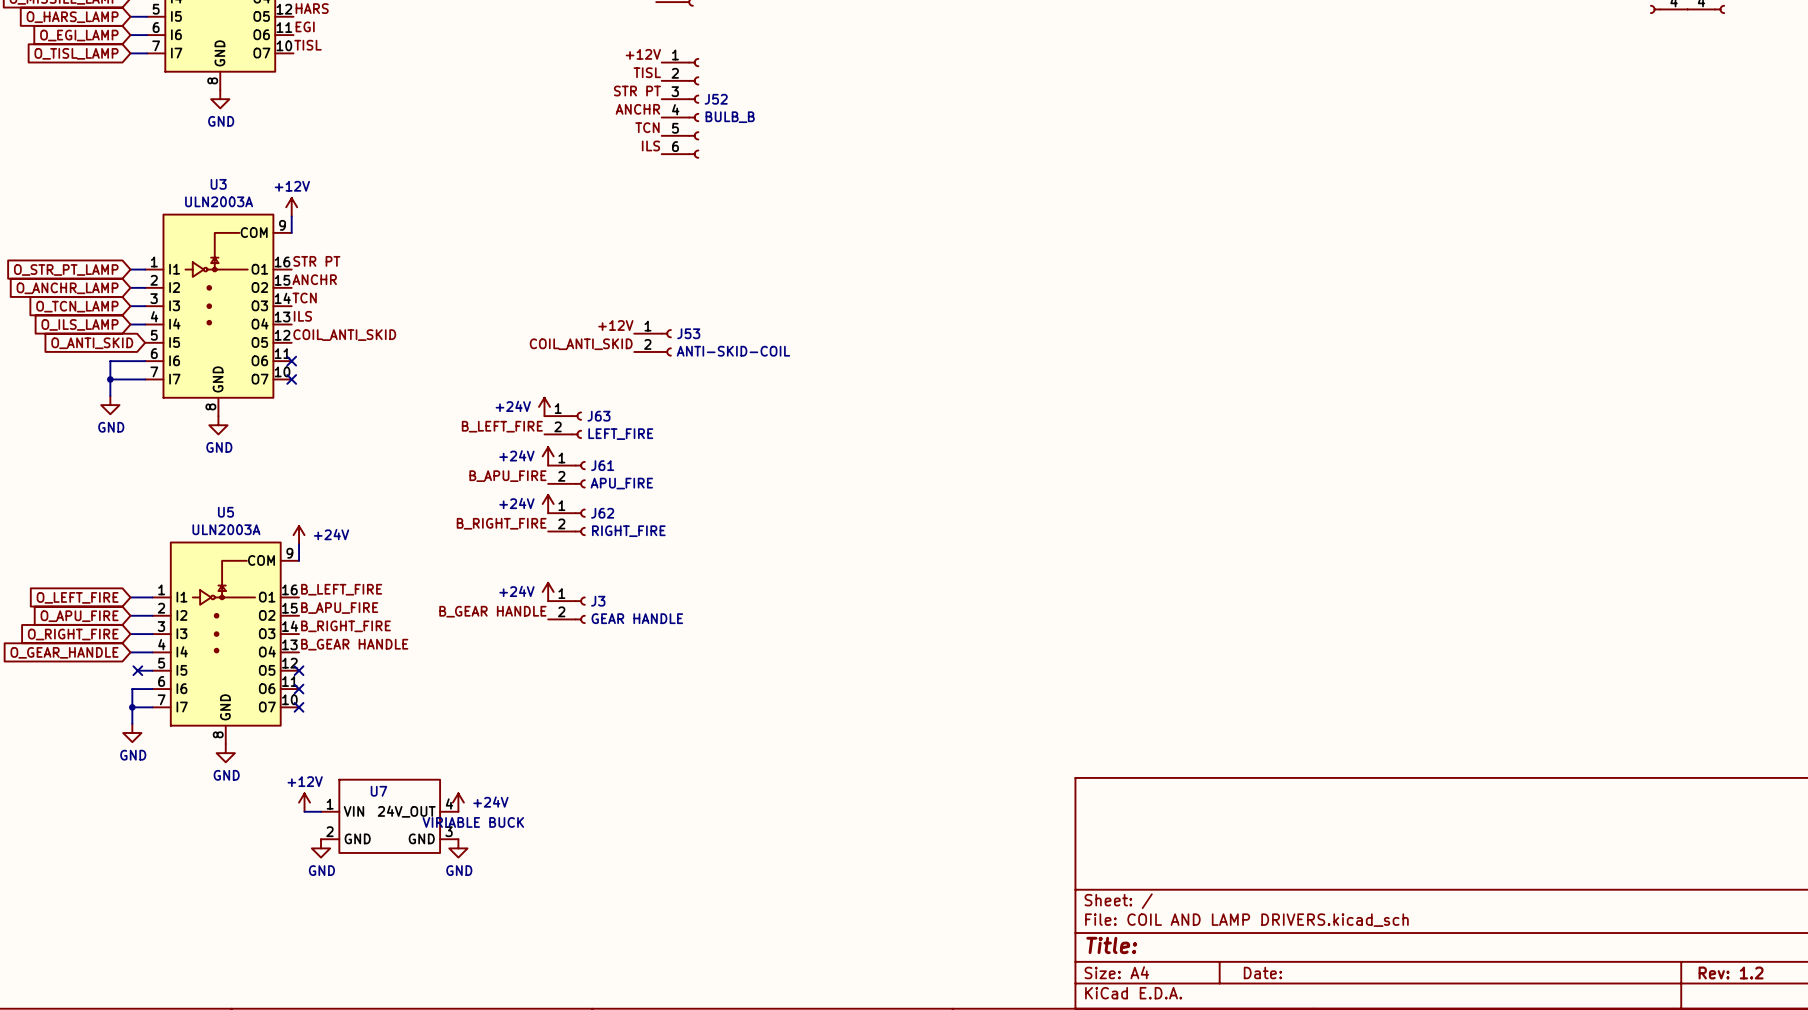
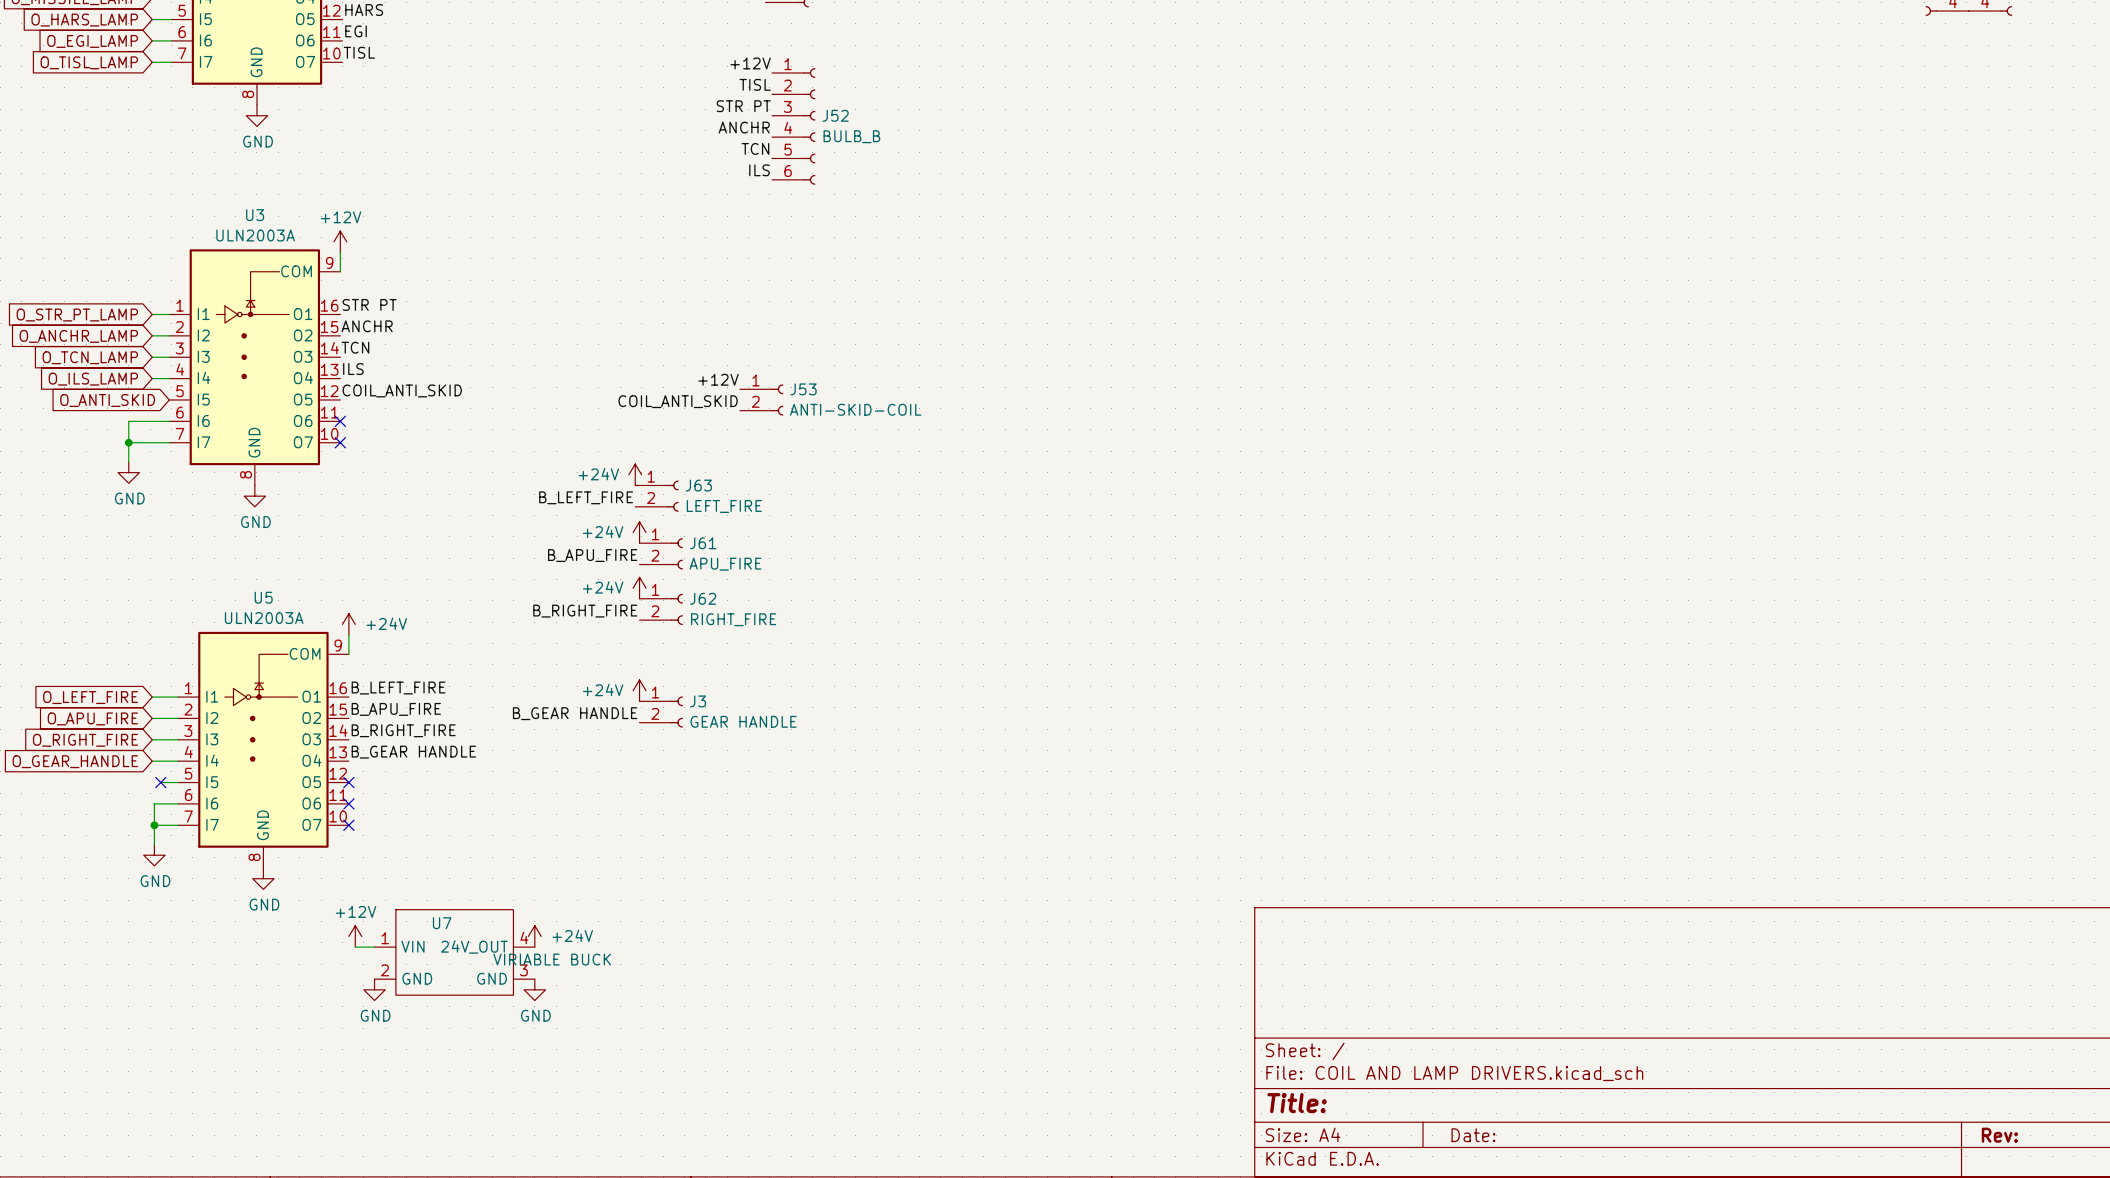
title block: Rev: 1.2 (1731, 972) -> Rev: (1999, 1135)

